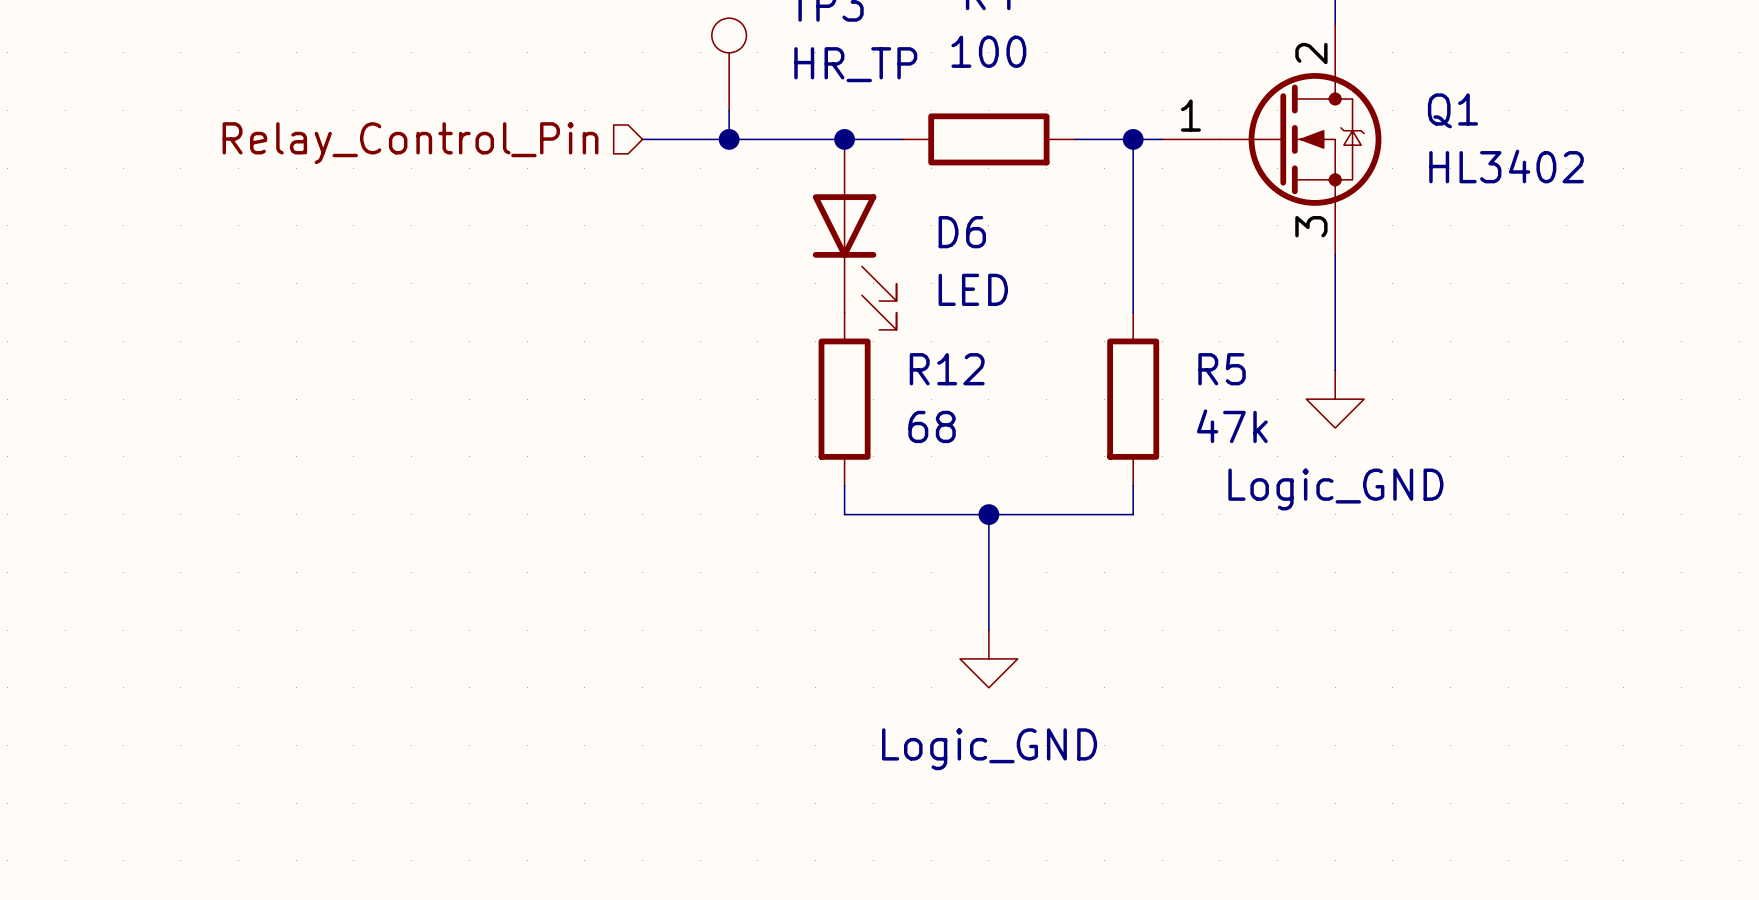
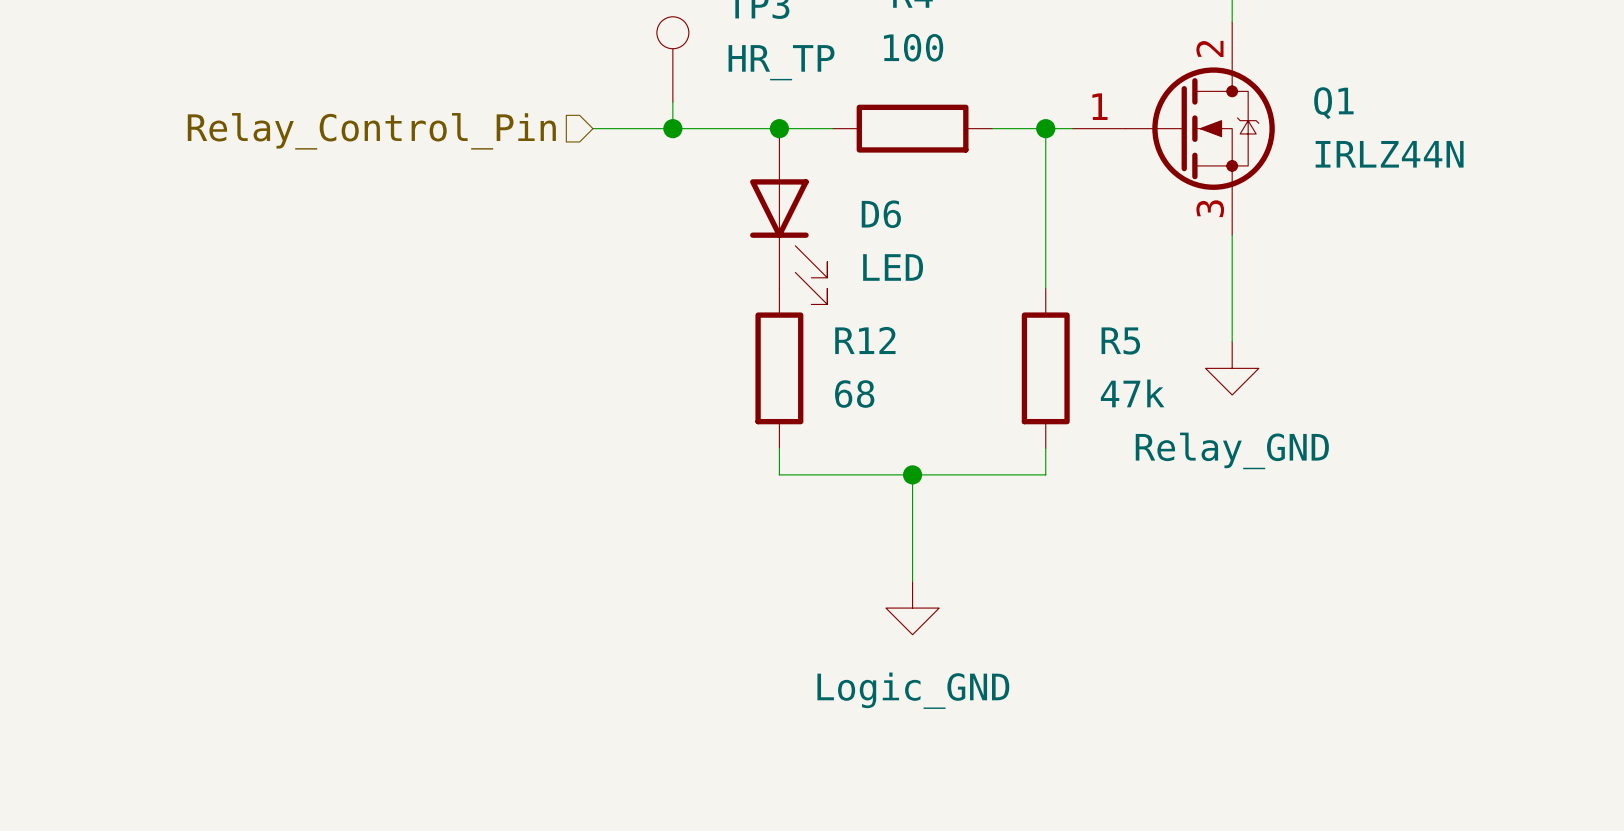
Q1 value: HL3402 (1506, 166) -> IRLZ44N (1389, 154)
power symbol: Logic_GND (1335, 399) -> Relay_GND (1232, 368)

